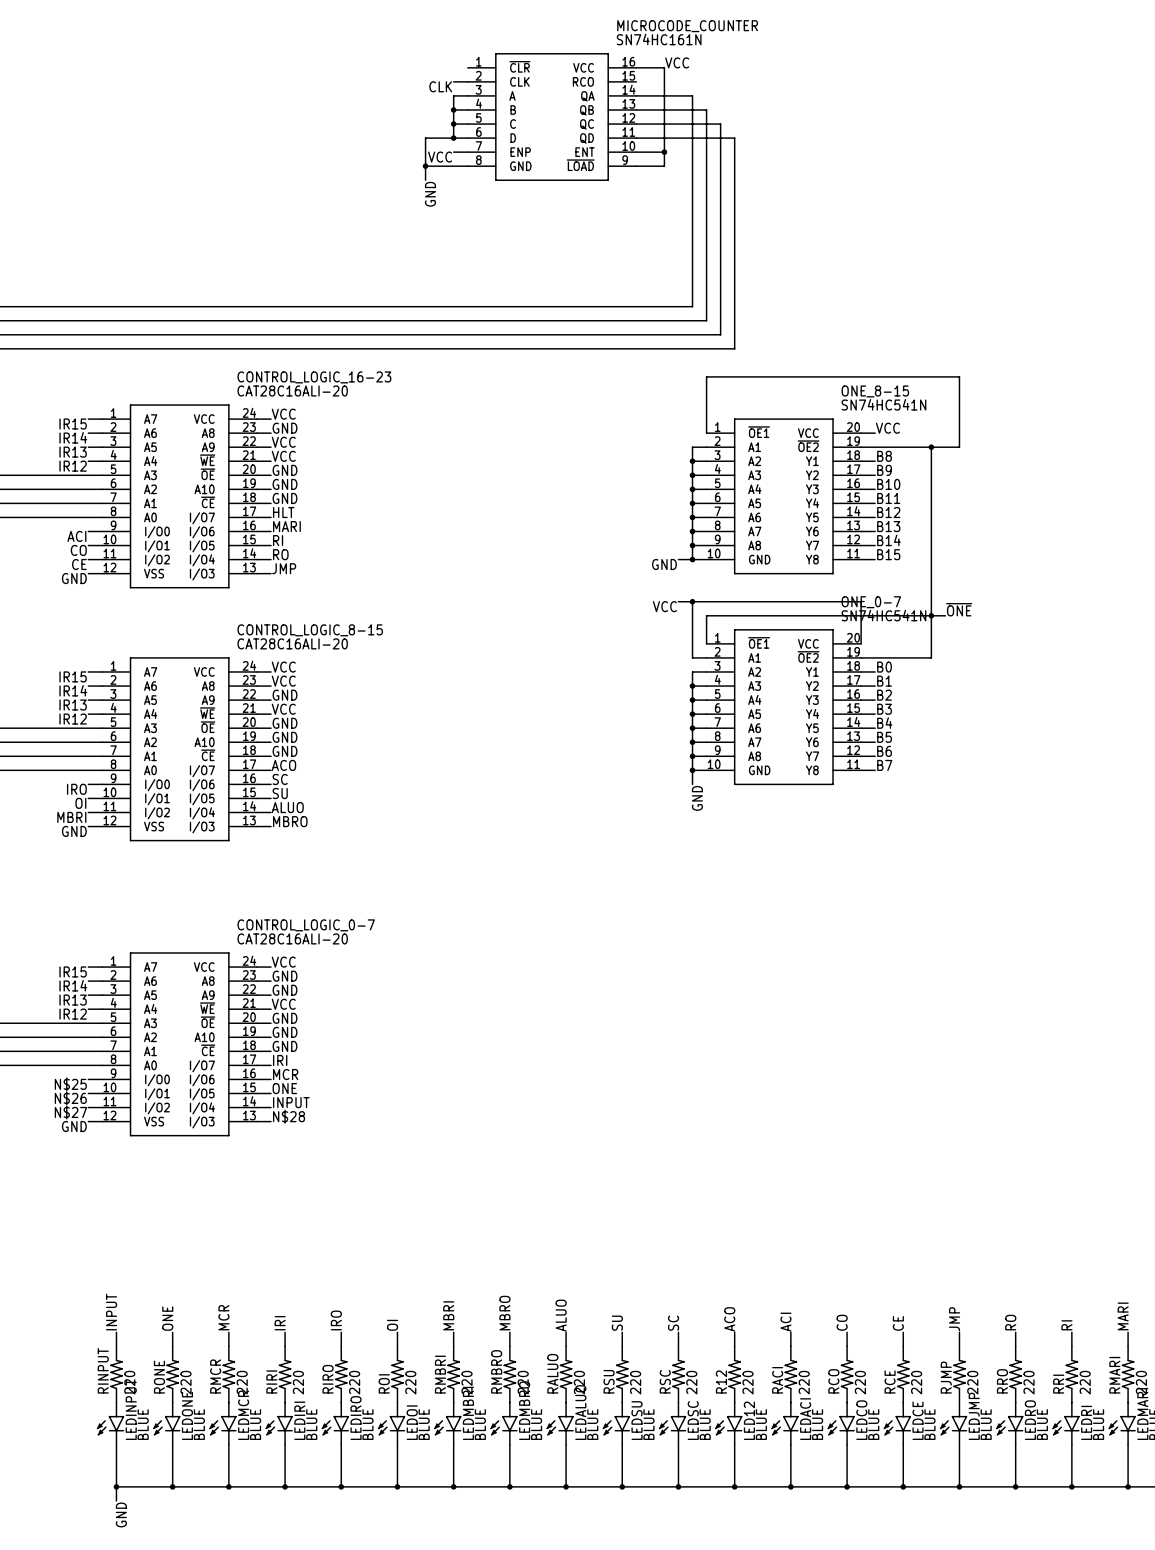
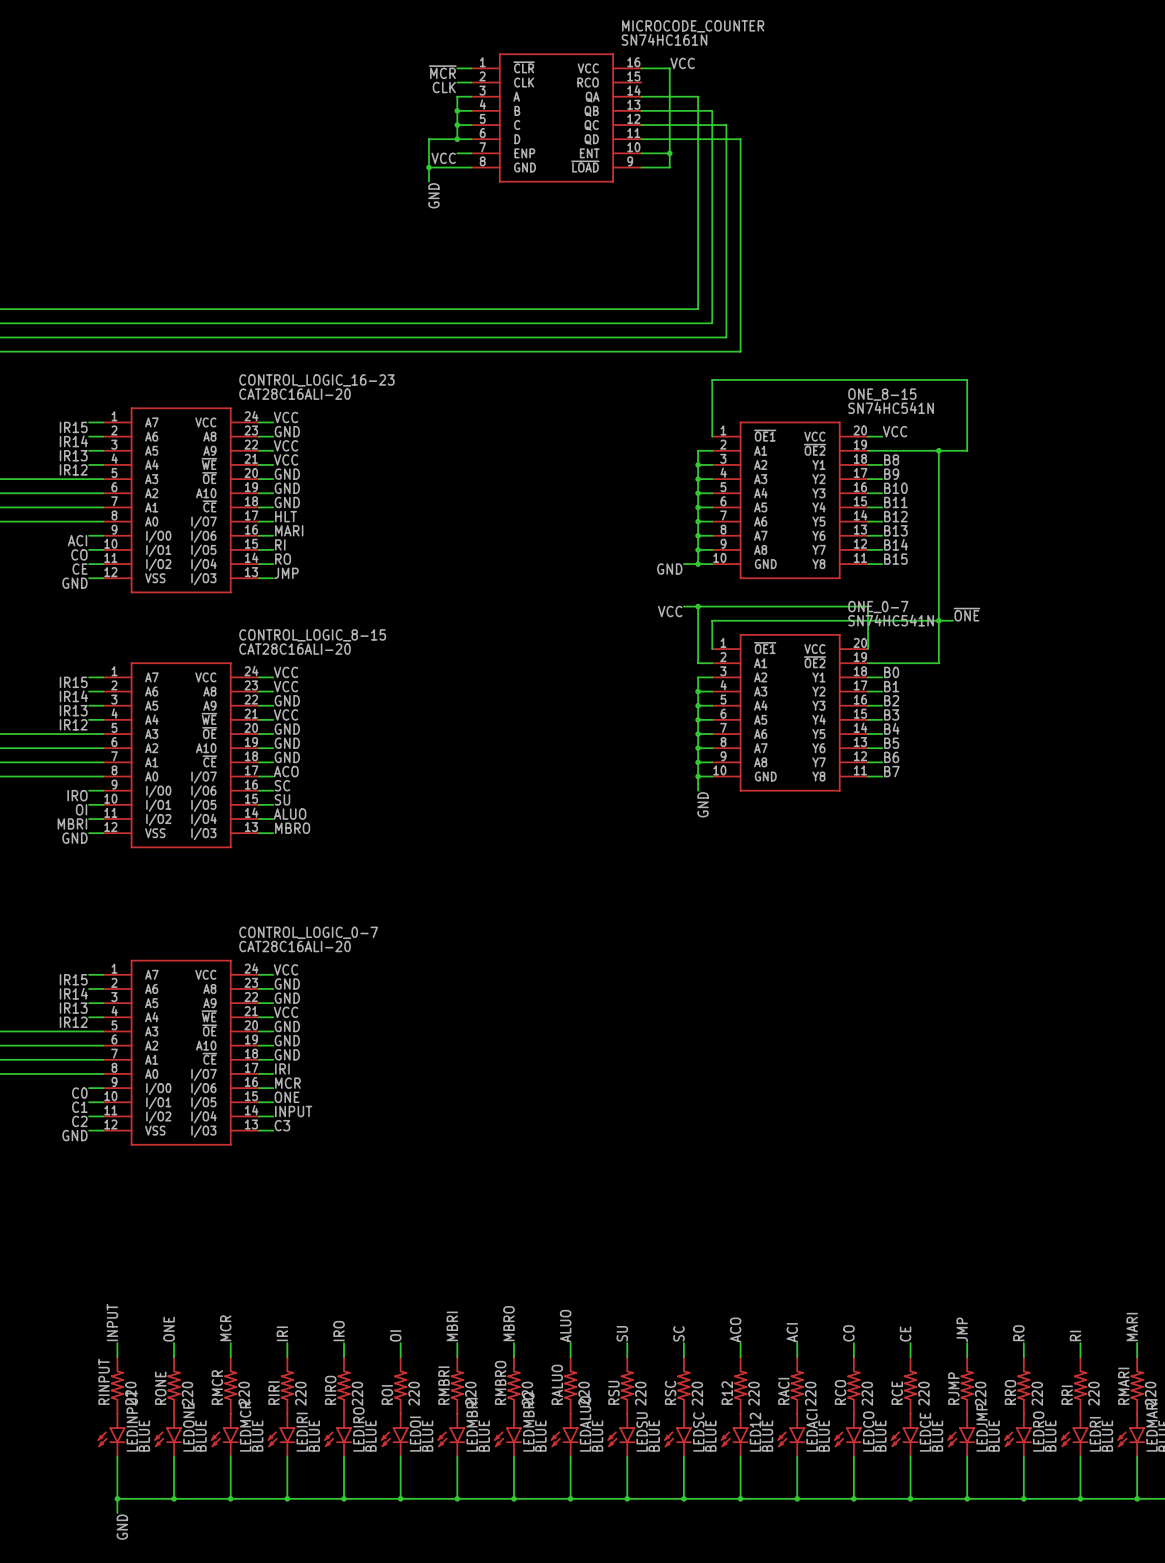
wire: none -> (457, 68) (471, 68)
label: none -> ~{MCR} (442, 72)
label: N$25 (70, 1084) -> C0 (79, 1093)
label: N$26 (70, 1098) -> C1 (79, 1107)
label: N$27 (70, 1112) -> C2 (79, 1121)
label: N$28 (289, 1116) -> C3 (282, 1125)

